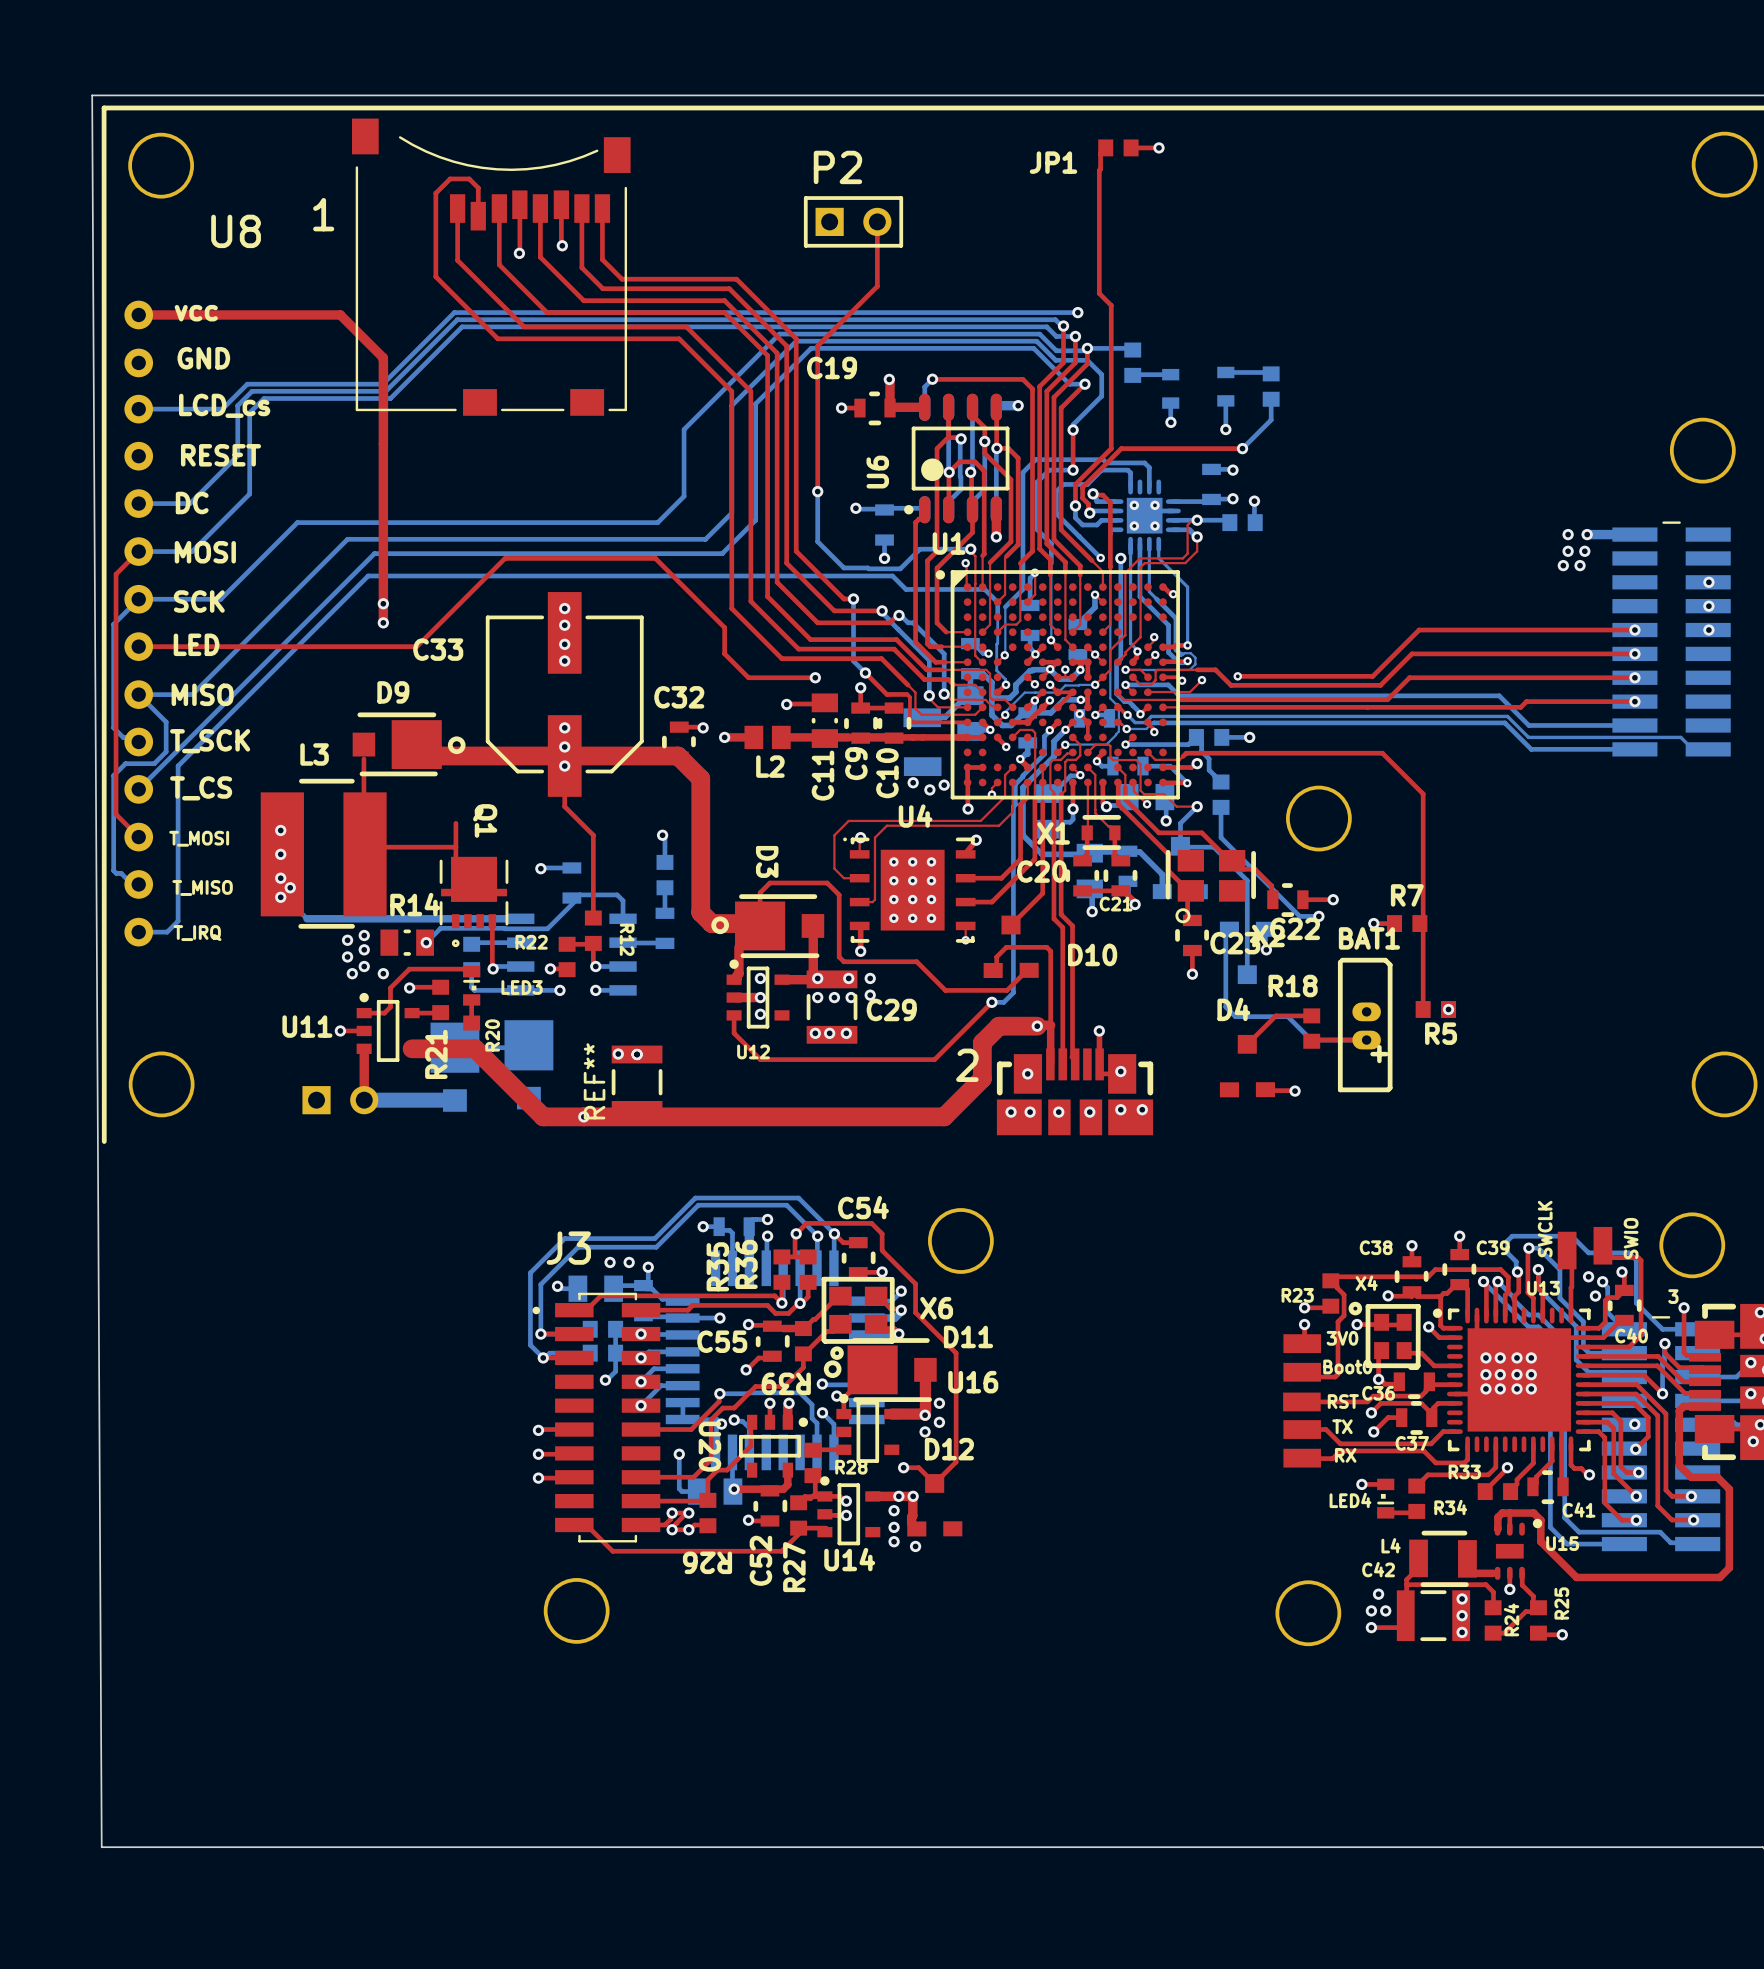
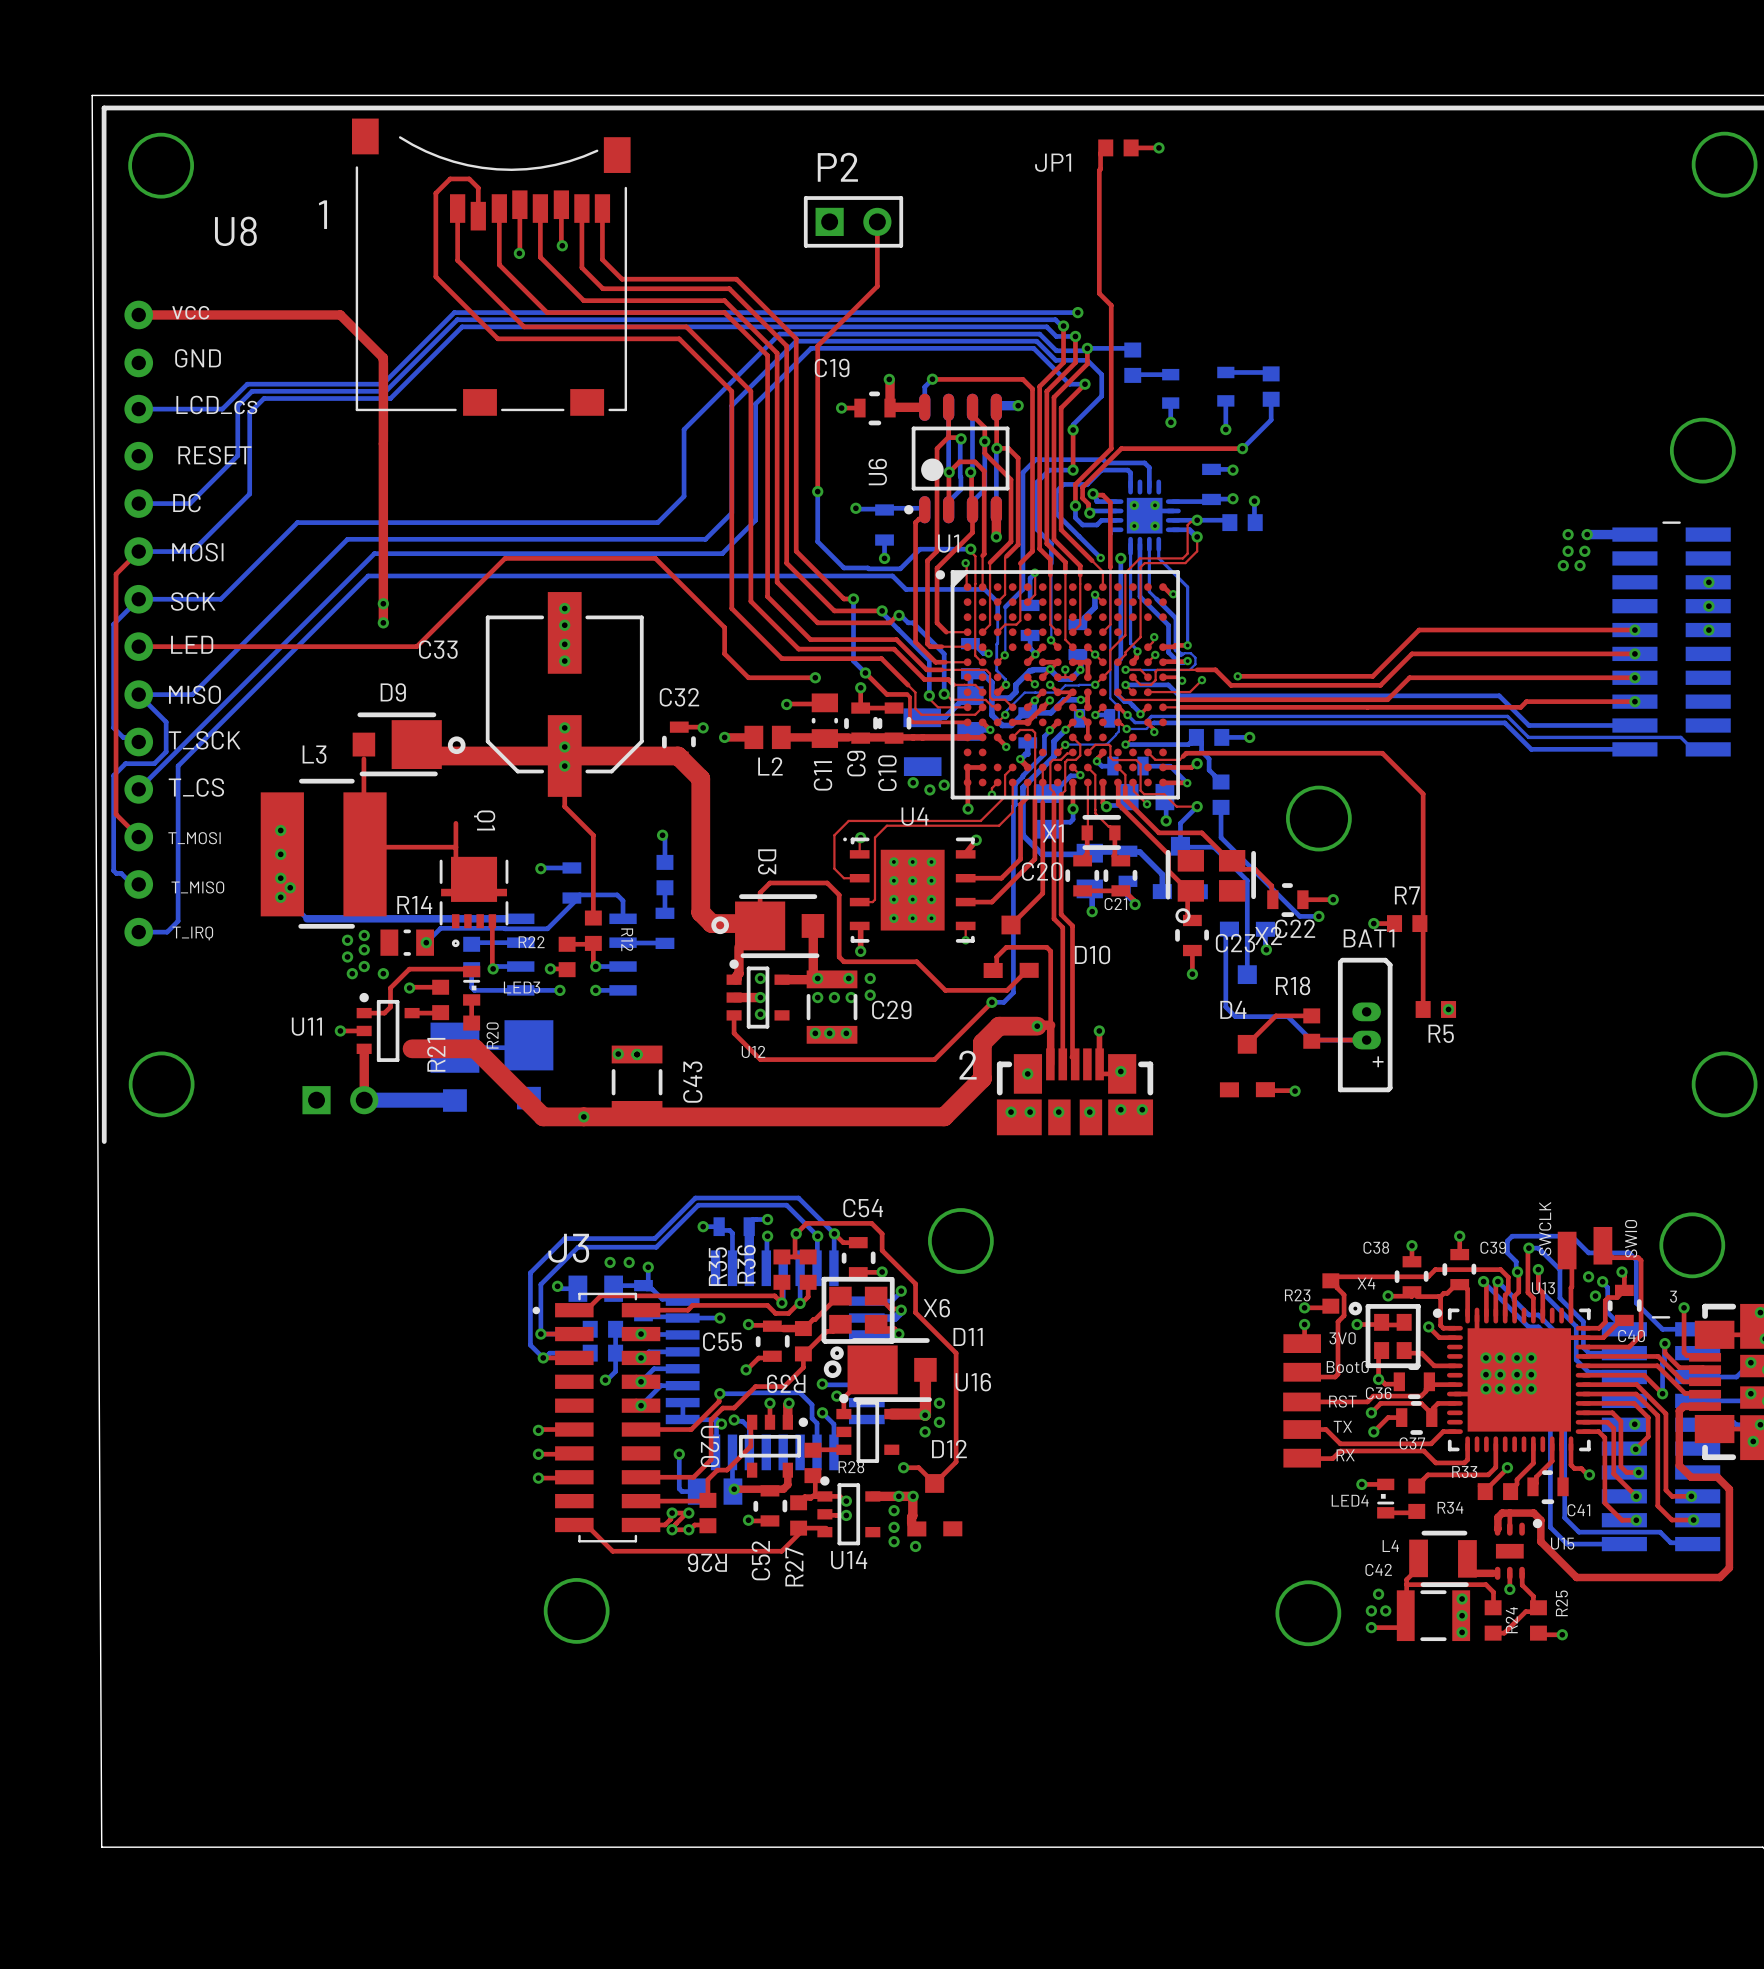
REF** name: REF** (594, 1081) -> C43 (692, 1082)

